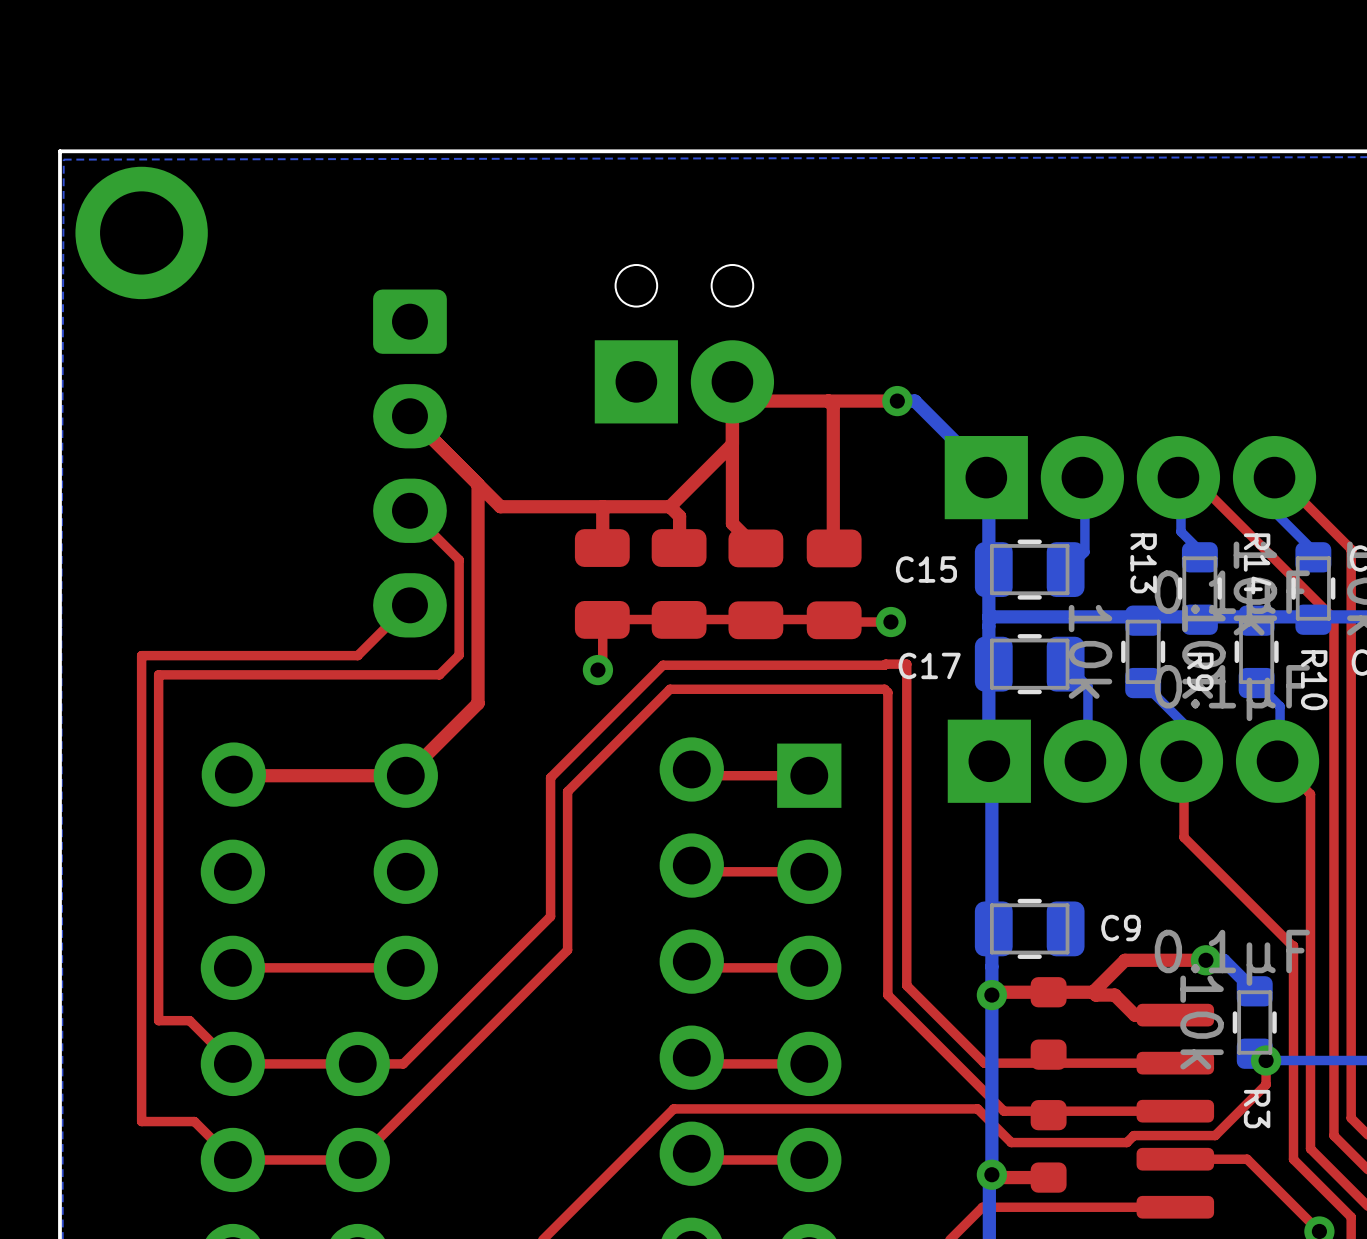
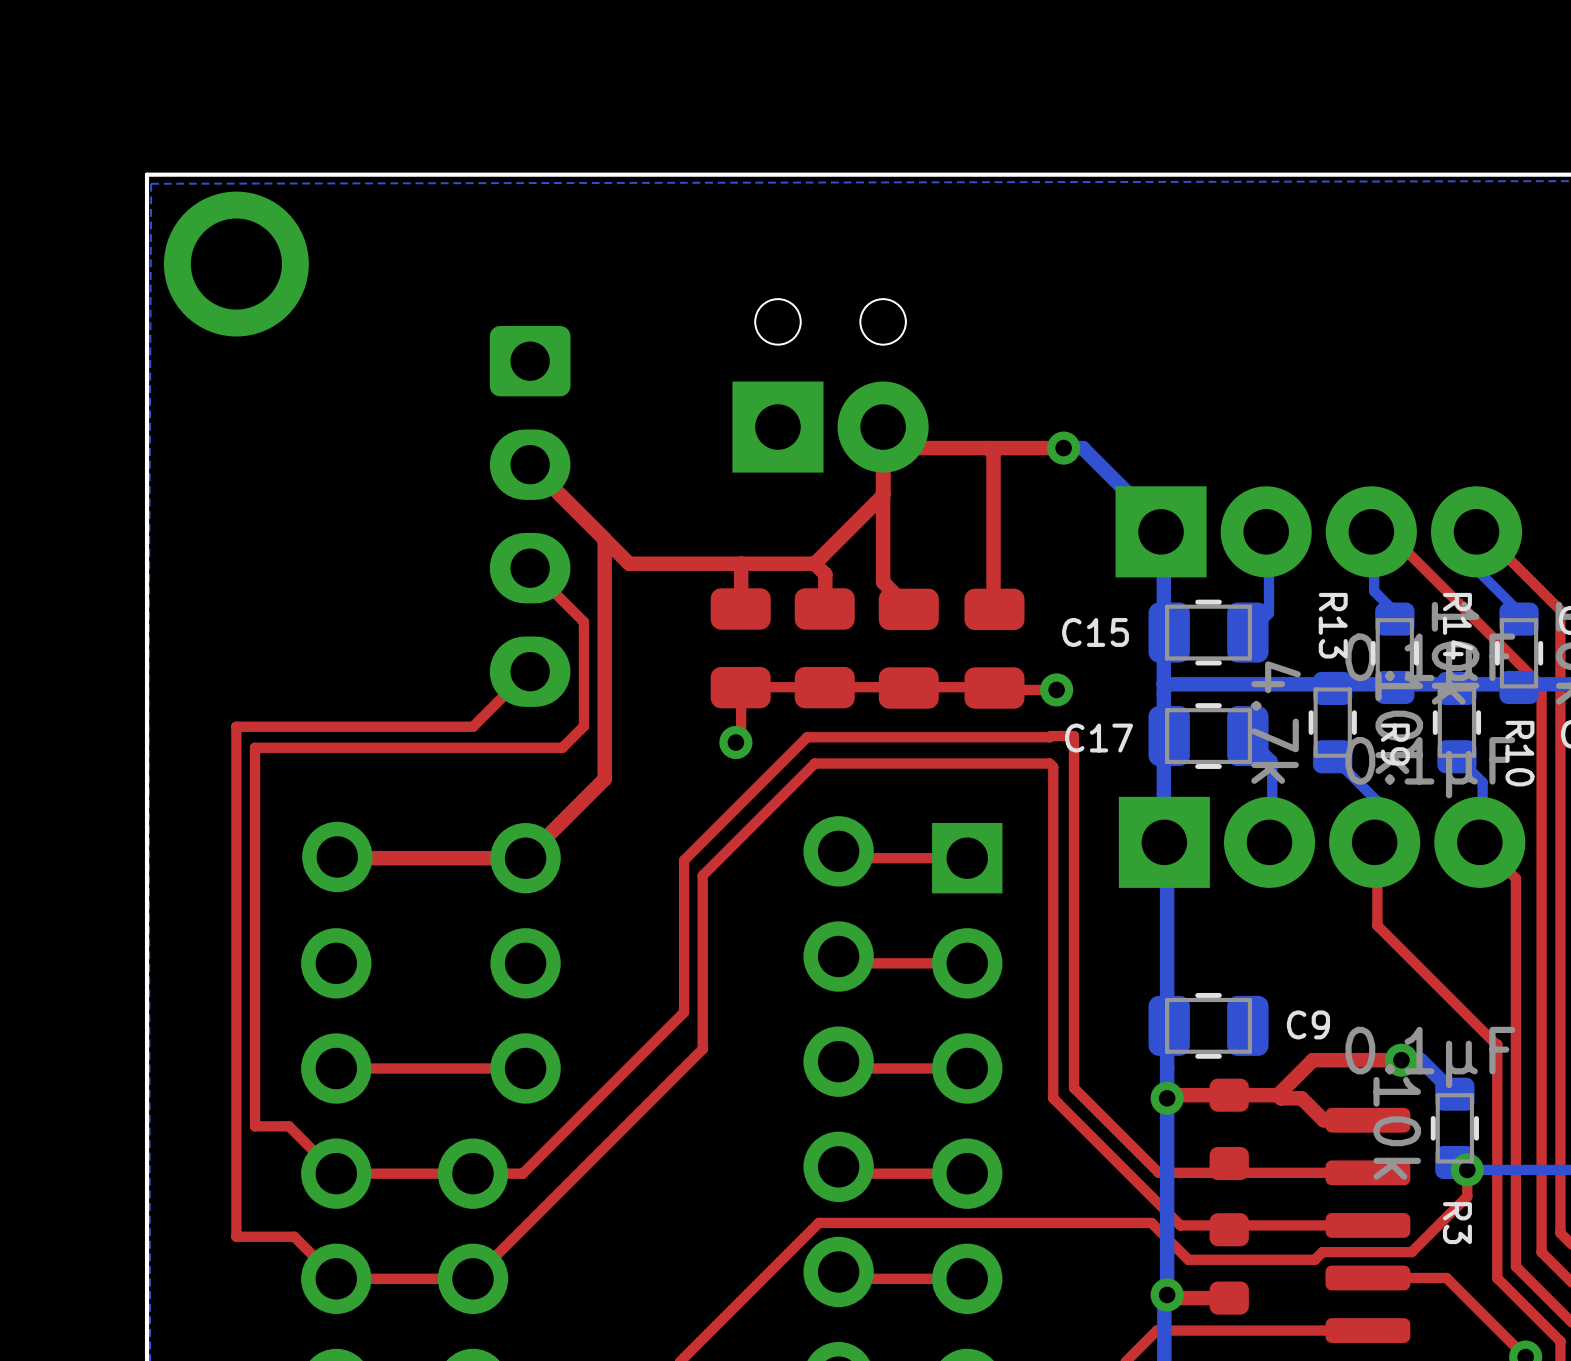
R13 value: 10k (1090, 651) -> 4.7k (1276, 722)

